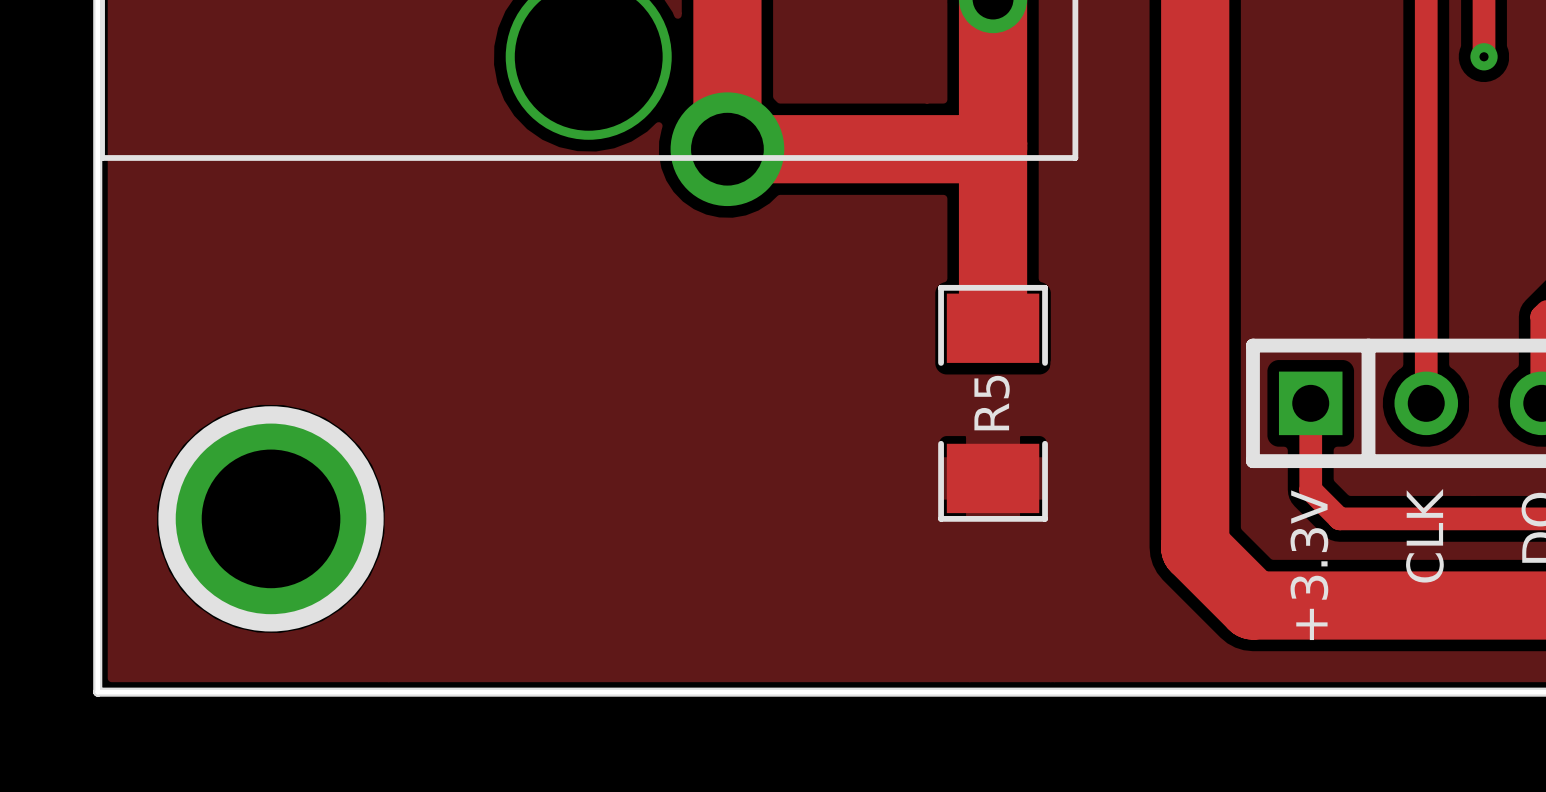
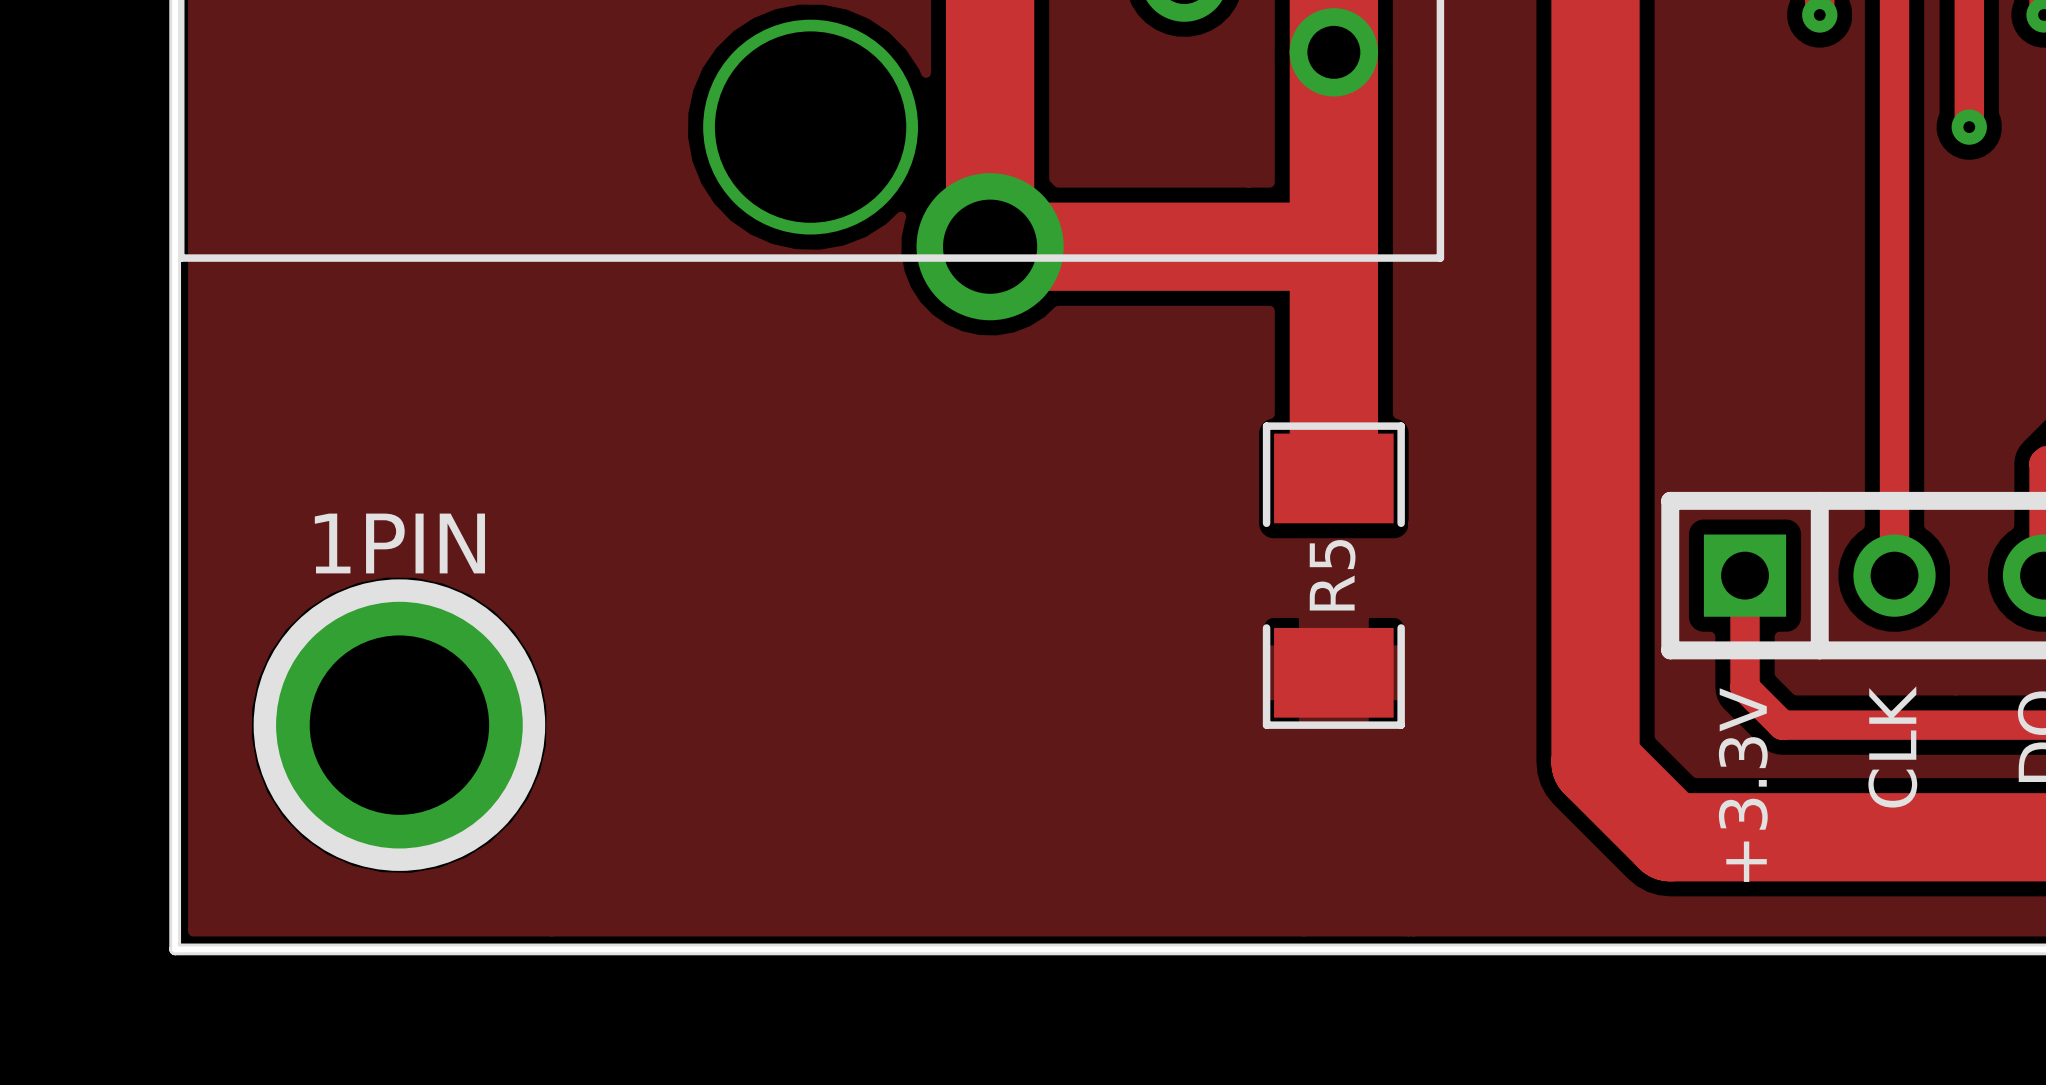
1PIN name: none -> 1PIN (399, 543)

